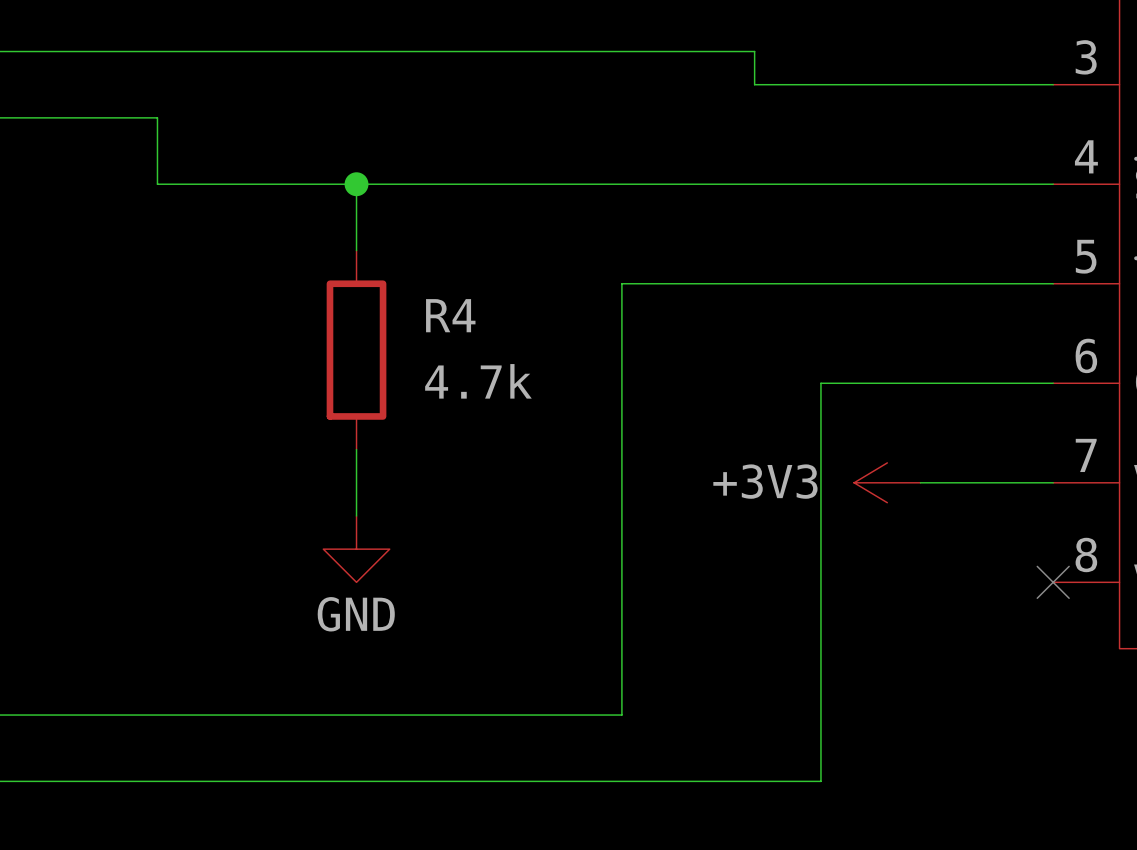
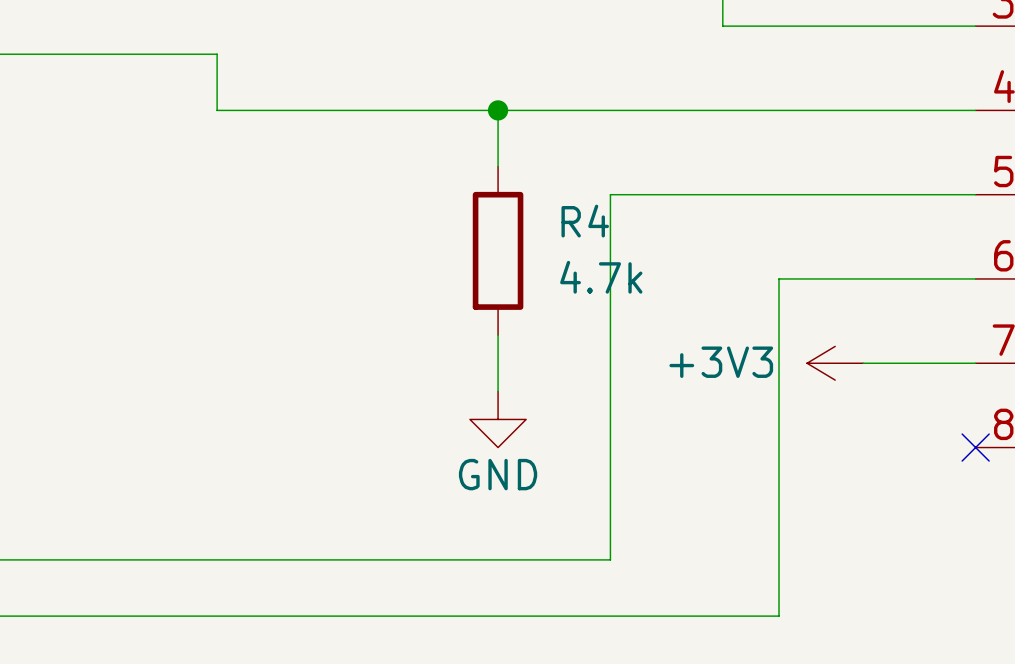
wire: (356, 184) (356, 250) -> (498, 110) (498, 166)
junction position: (356, 184) -> (498, 110)
R4 position: (356, 350) -> (498, 250)
wire: (356, 449) (356, 515) -> (498, 335) (498, 391)
power symbol position: GND (356, 549) -> GND (498, 419)

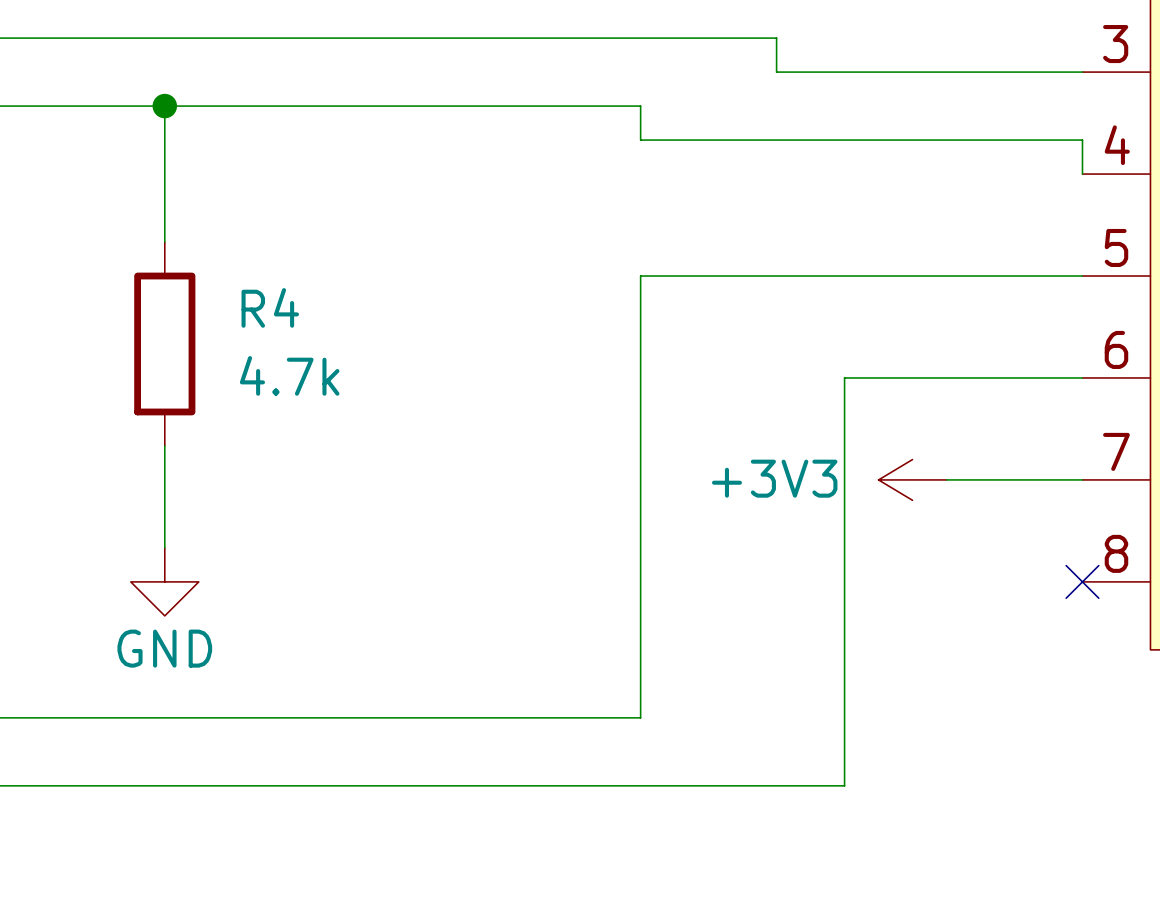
junction: none -> (164, 106)
wire: (217, 110) (975, 110) -> (164, 106) (640, 106) (640, 140) (1082, 140) (1082, 174)
wire: (498, 110) (498, 166) -> (164, 174) (164, 242)
junction: (498, 110) -> none
R4 position: (498, 250) -> (164, 343)
wire: none -> (164, 445) (164, 547)
wire: (498, 335) (498, 391) -> none
power symbol position: GND (498, 419) -> GND (164, 581)

